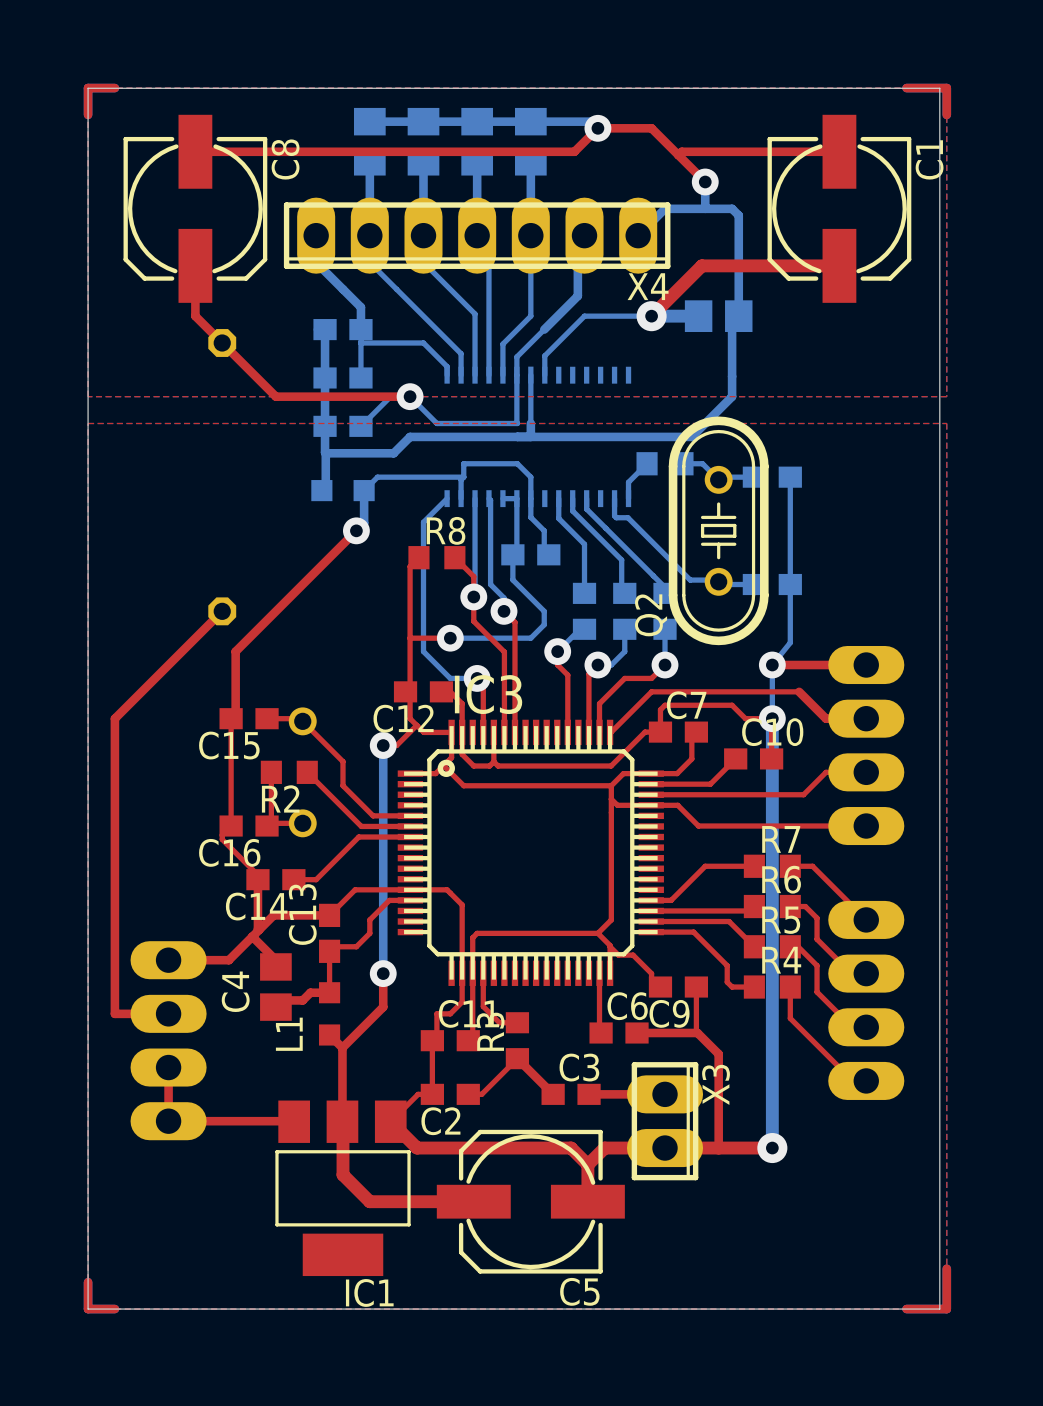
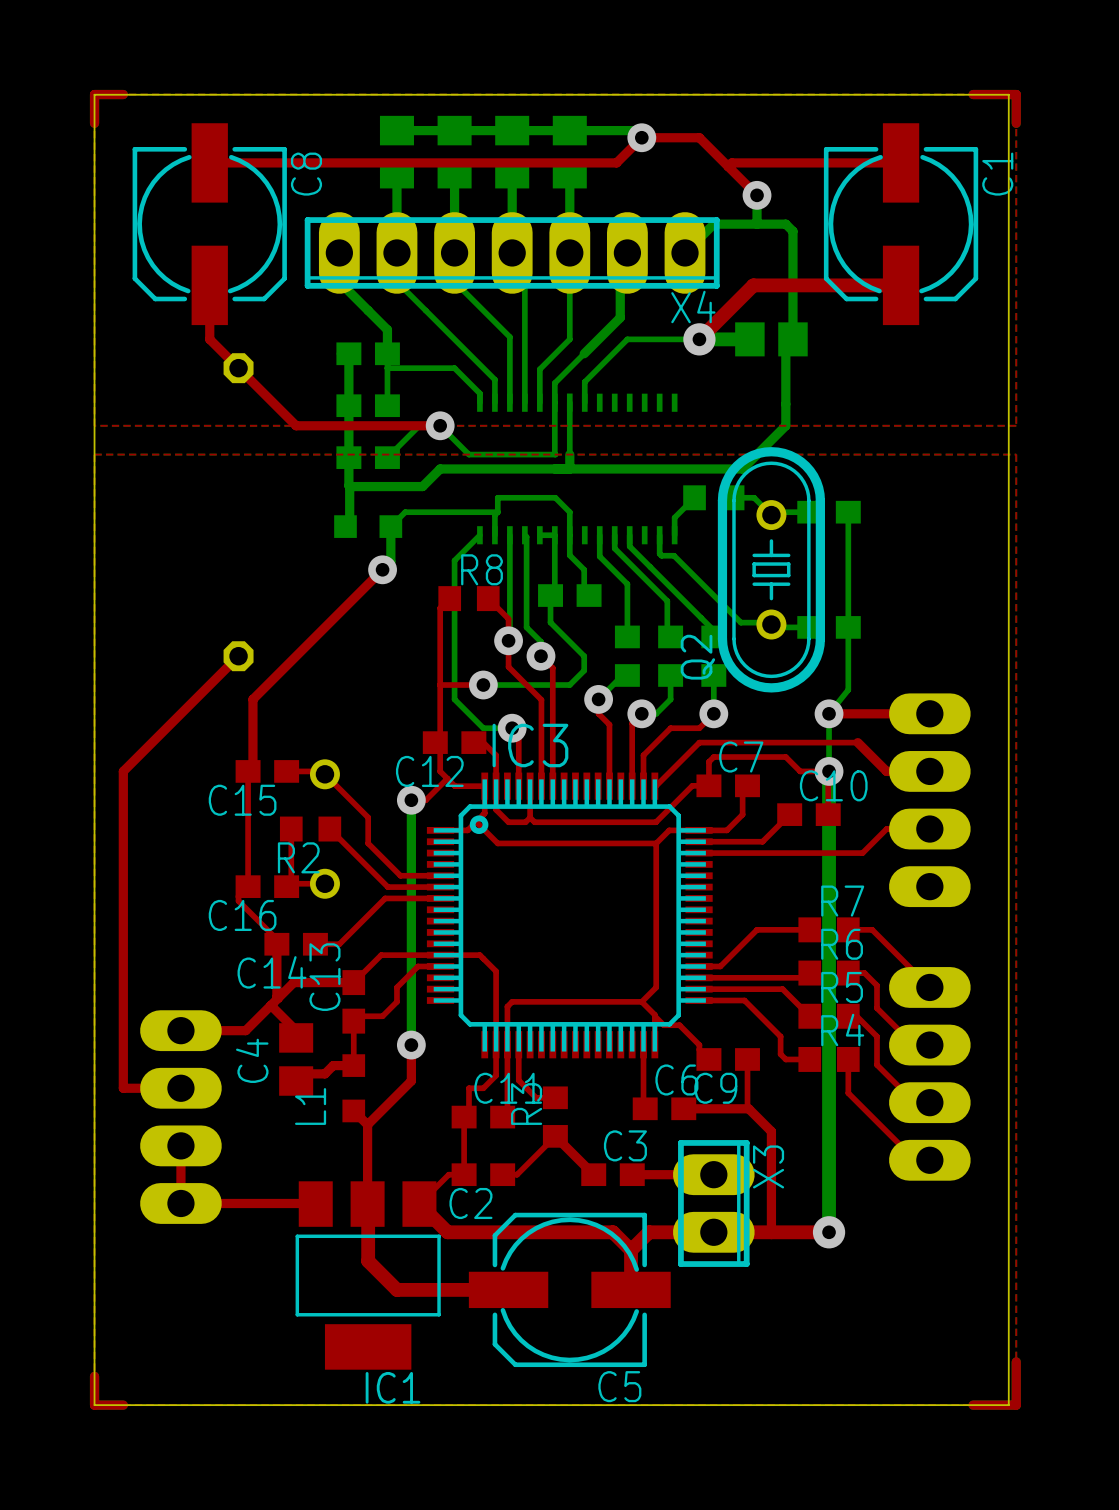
top track: (611, 799) (617, 805) (677, 805) (698, 826) (866, 826) -> none

